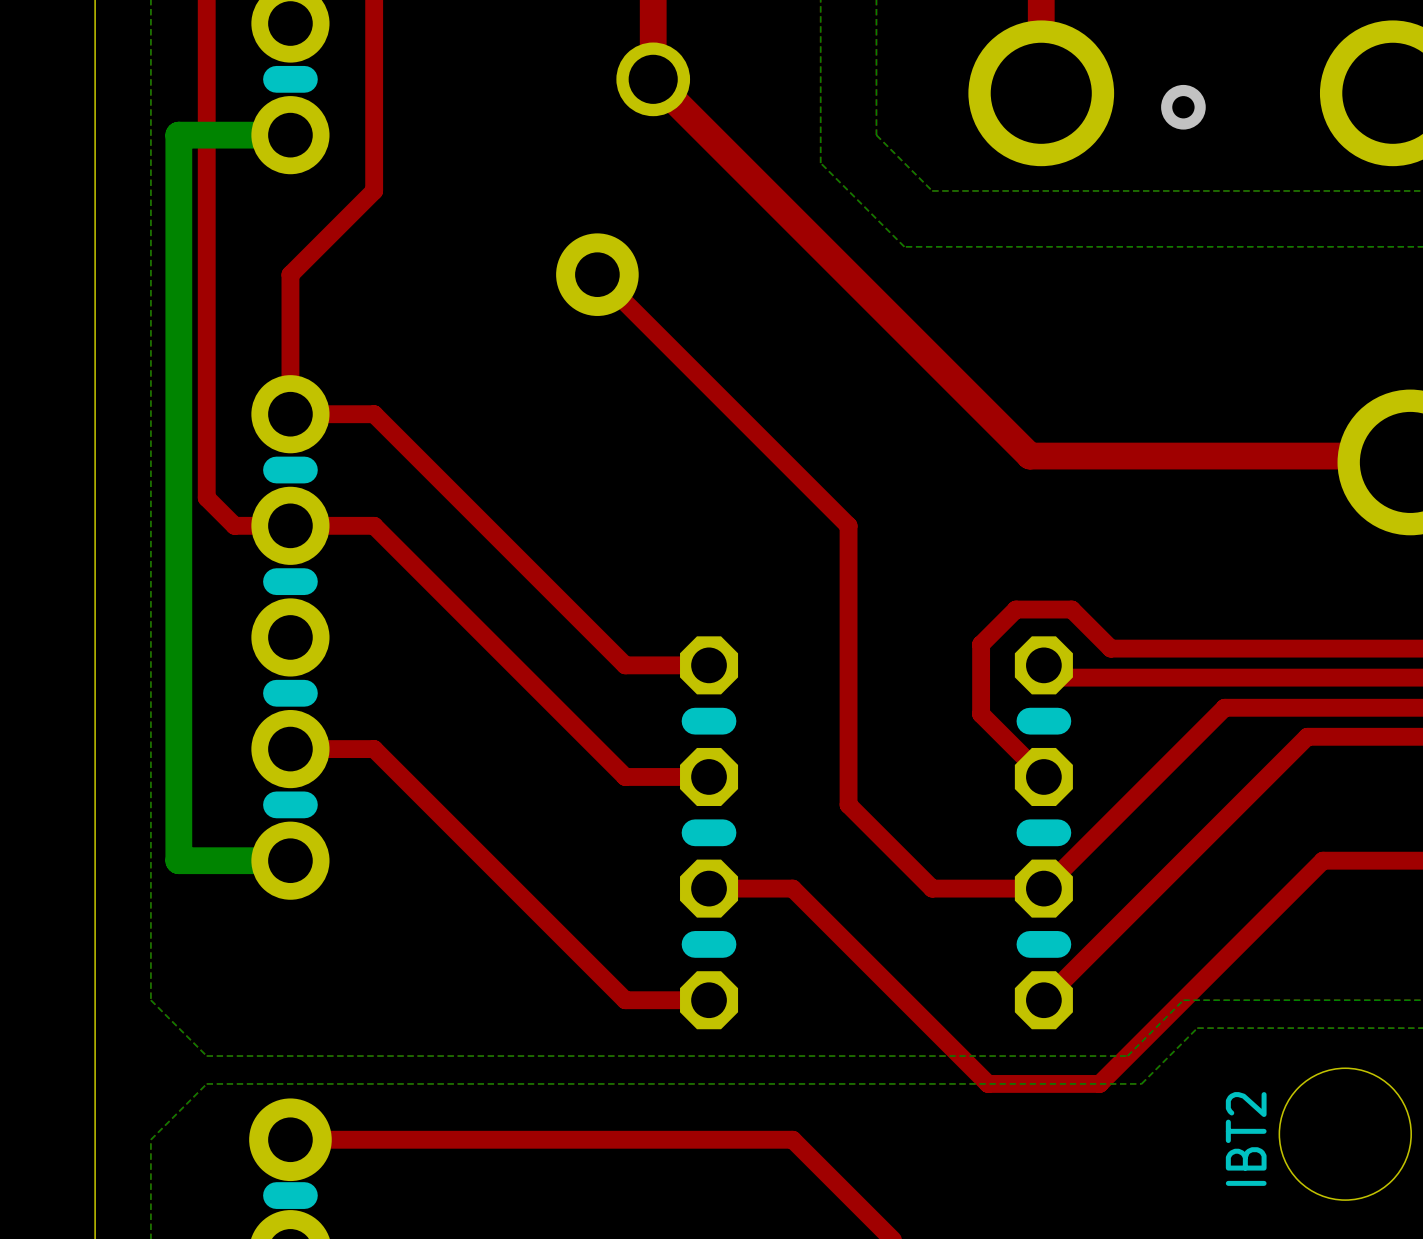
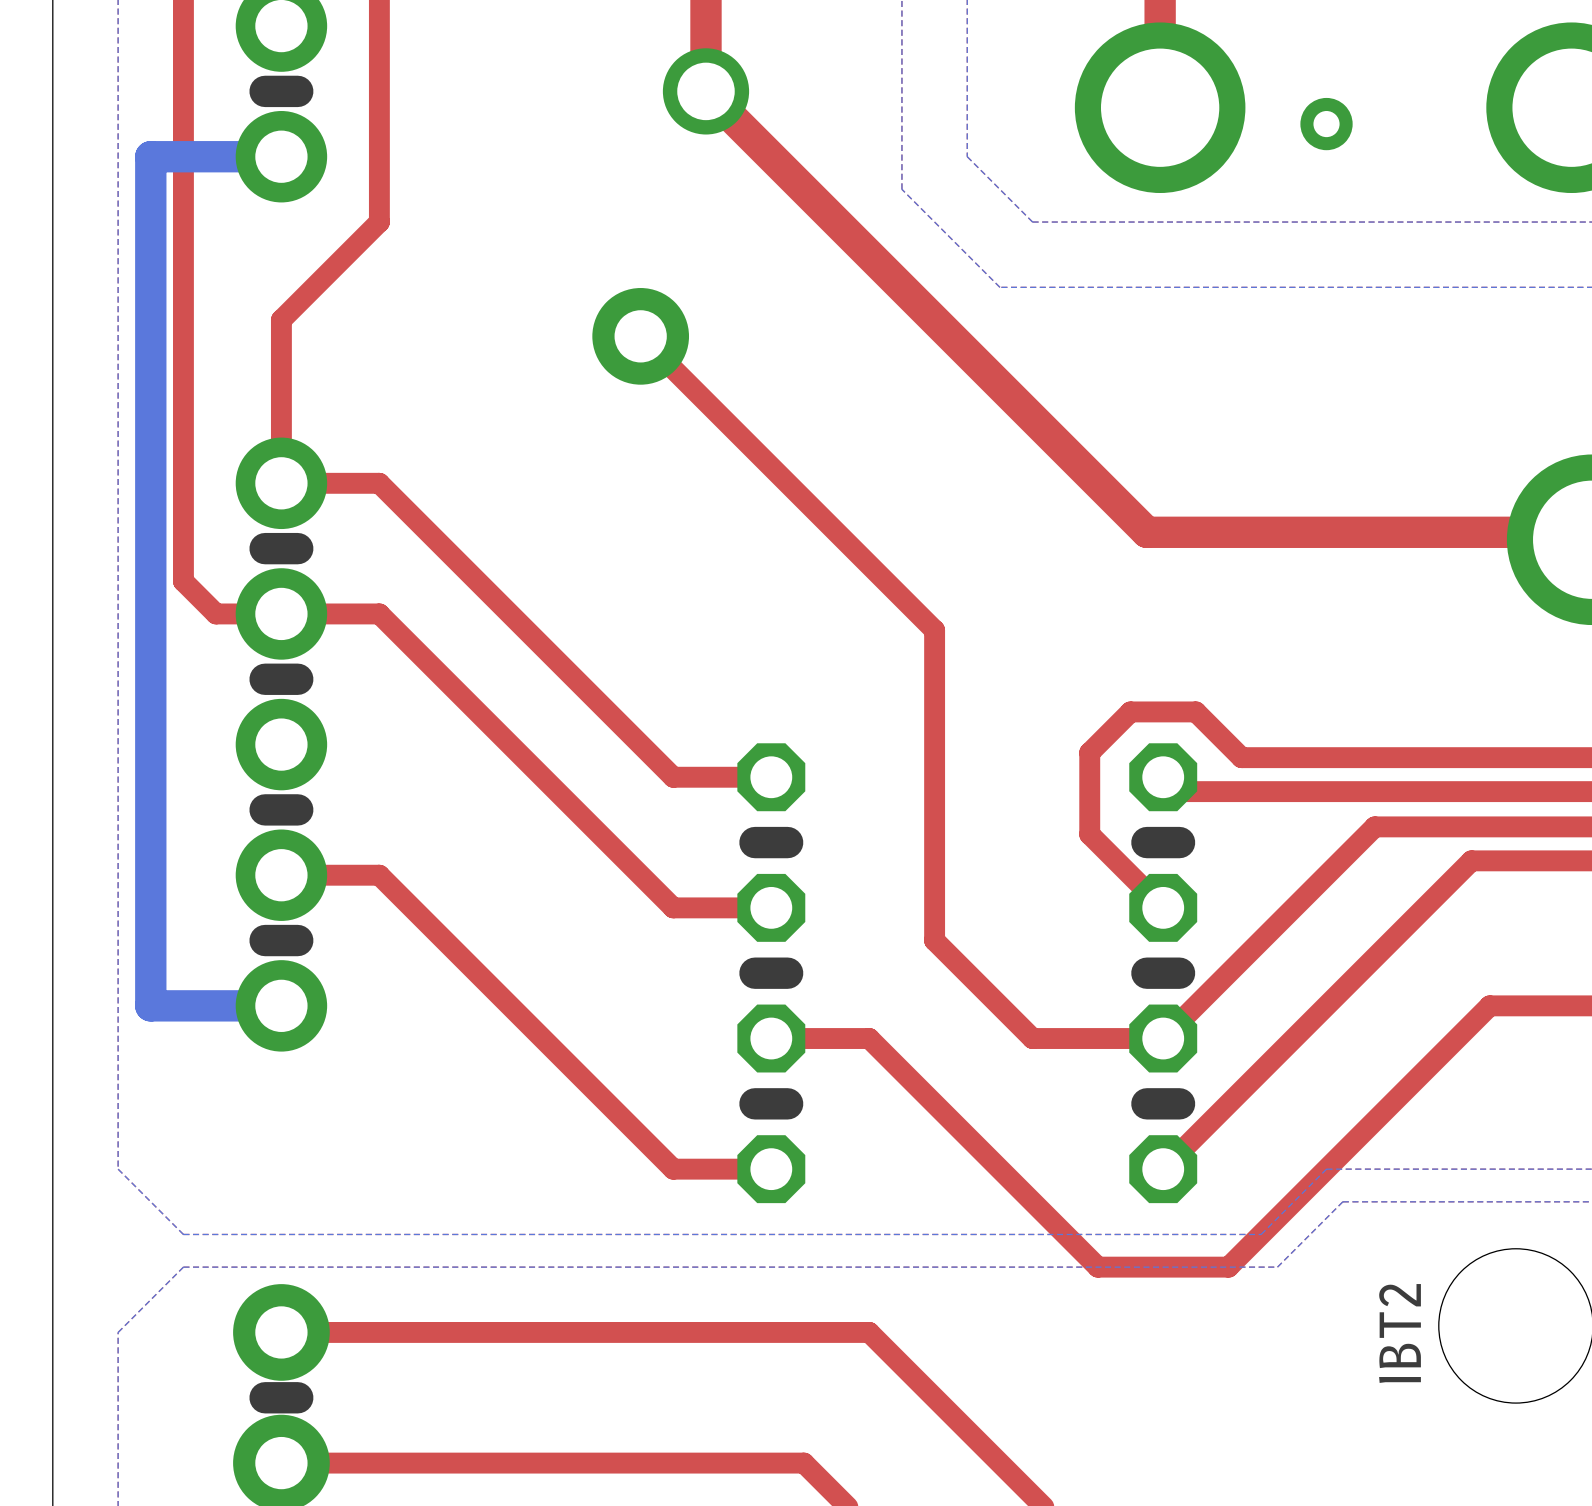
top track: (597, 274) (848, 525) (848, 539) -> (640, 336) (934, 630)
part position: (597, 274) -> (640, 336)

